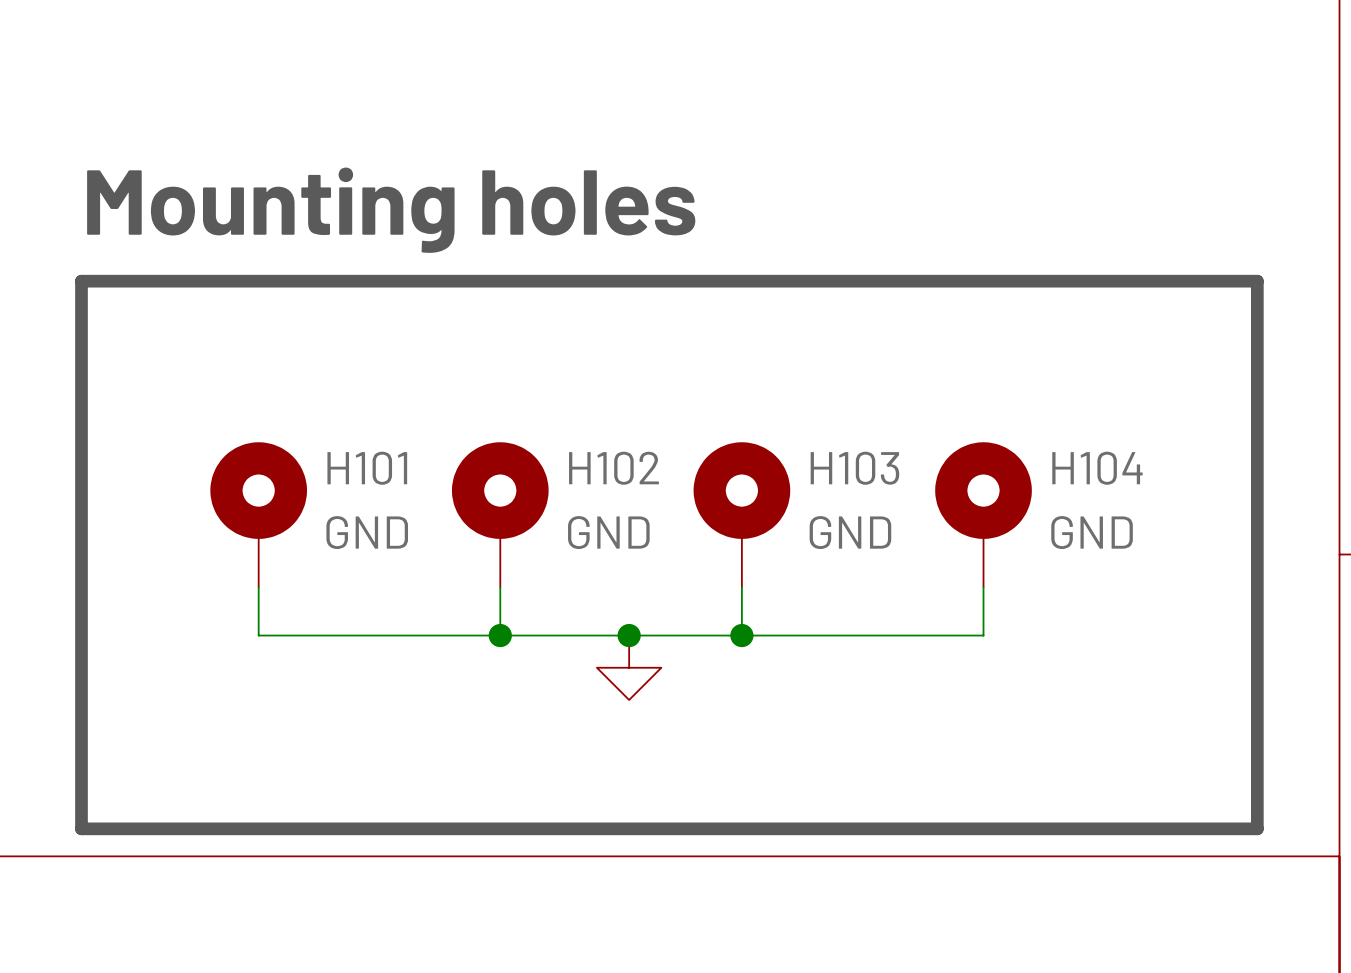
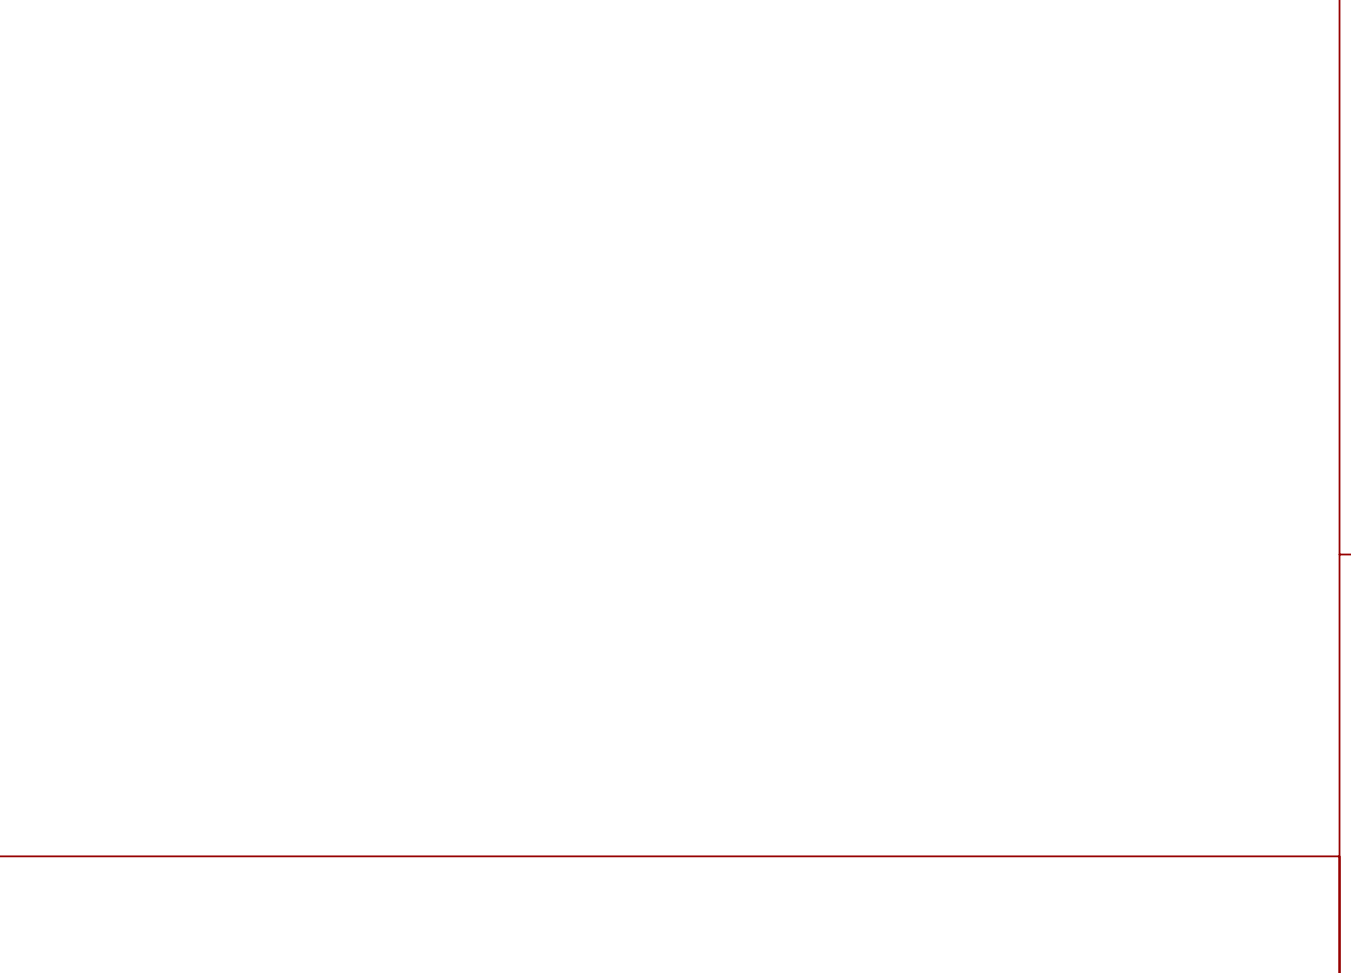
text: Mounting holes (391, 210) -> none
line: (81, 281) (1257, 281) (1257, 828) (81, 828) (81, 281) -> none
H101: GND (258, 514) -> none
H102: GND (500, 514) -> none
H103: GND (741, 514) -> none
H104: GND (983, 514) -> none
wire: (258, 587) (258, 635) (983, 635) (983, 587) -> none
wire: (500, 587) (500, 635) -> none
wire: (741, 587) (741, 635) -> none
junction: (500, 635) -> none
junction: (629, 635) -> none
junction: (741, 635) -> none
power symbol: (629, 667) -> none

